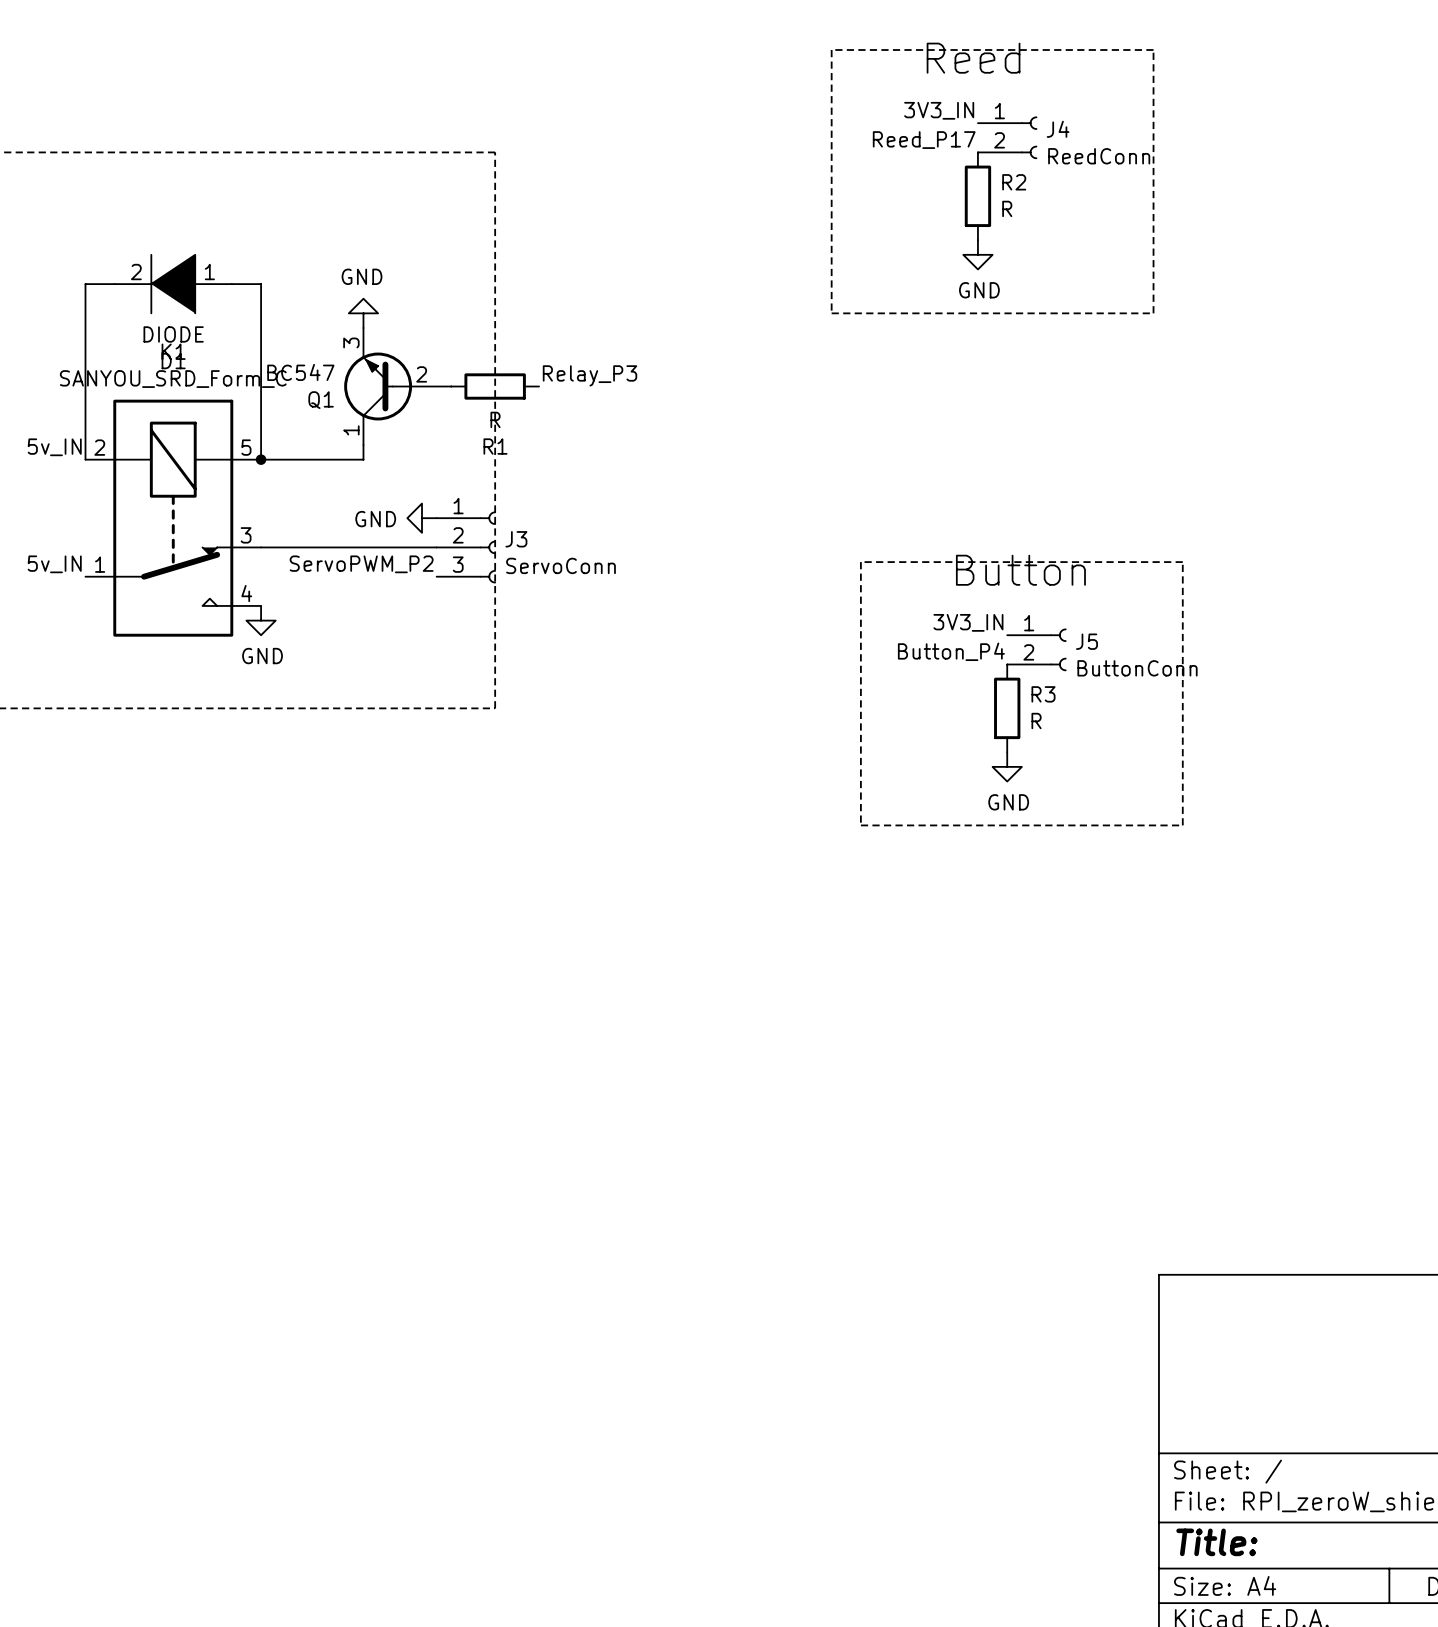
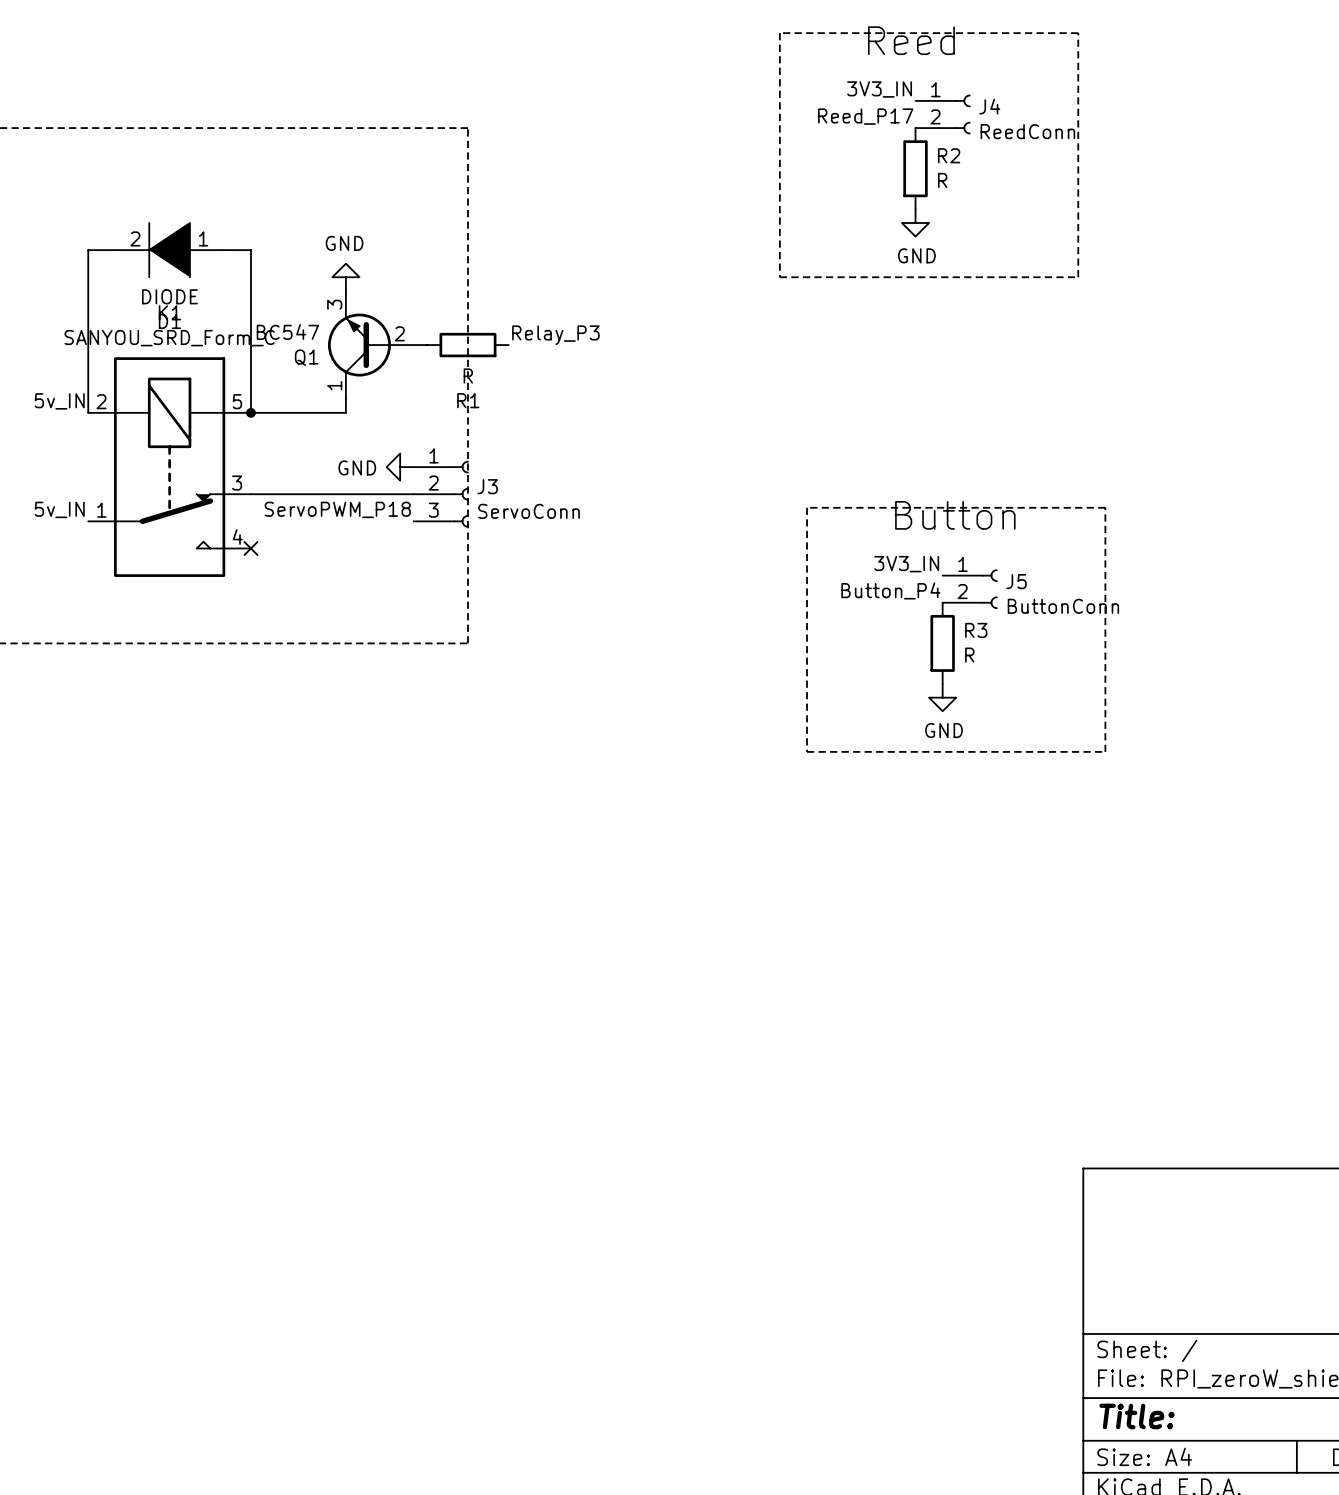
label: ServoPWM_P2 (361, 564) -> ServoPWM_P18 (337, 509)
no-connect mark: none -> (250, 548)
power symbol: GND (261, 620) -> none

